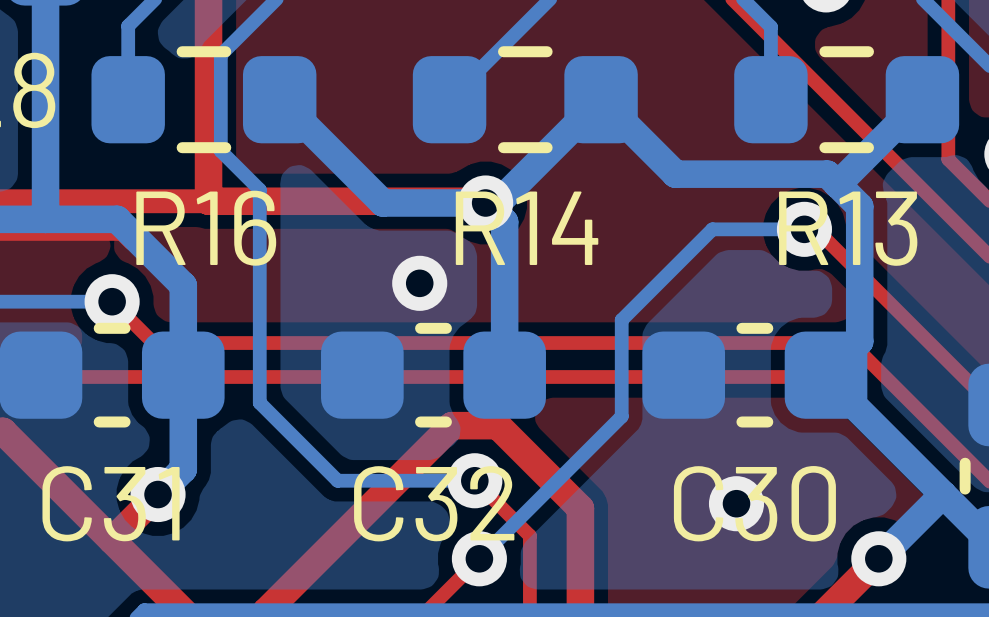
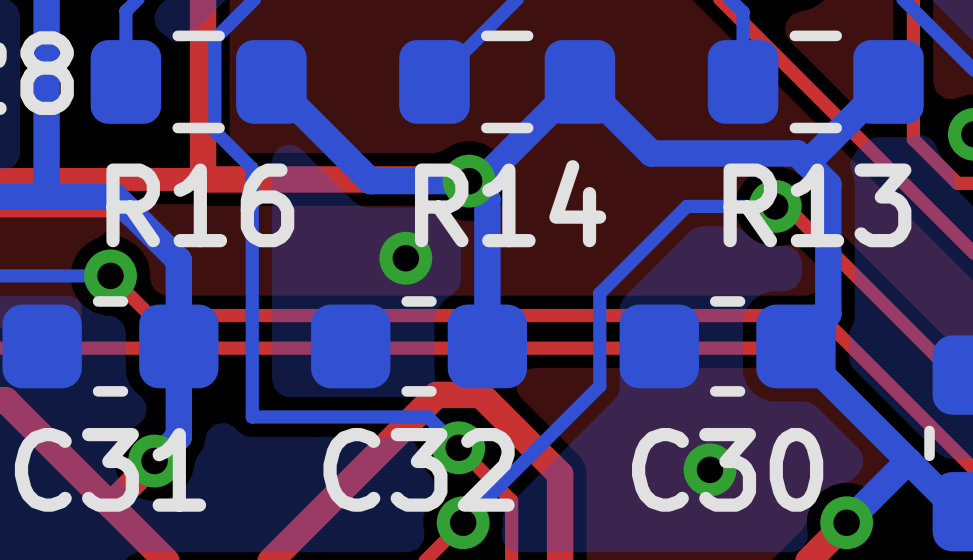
bottom track: (259, 402) (337, 480) (474, 480) -> (252, 373) (252, 416) (427, 416) (458, 447)

